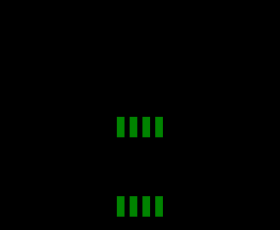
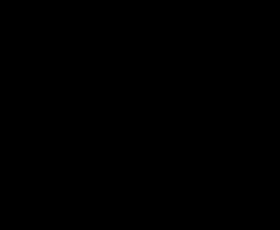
part: (139, 166) -> none

